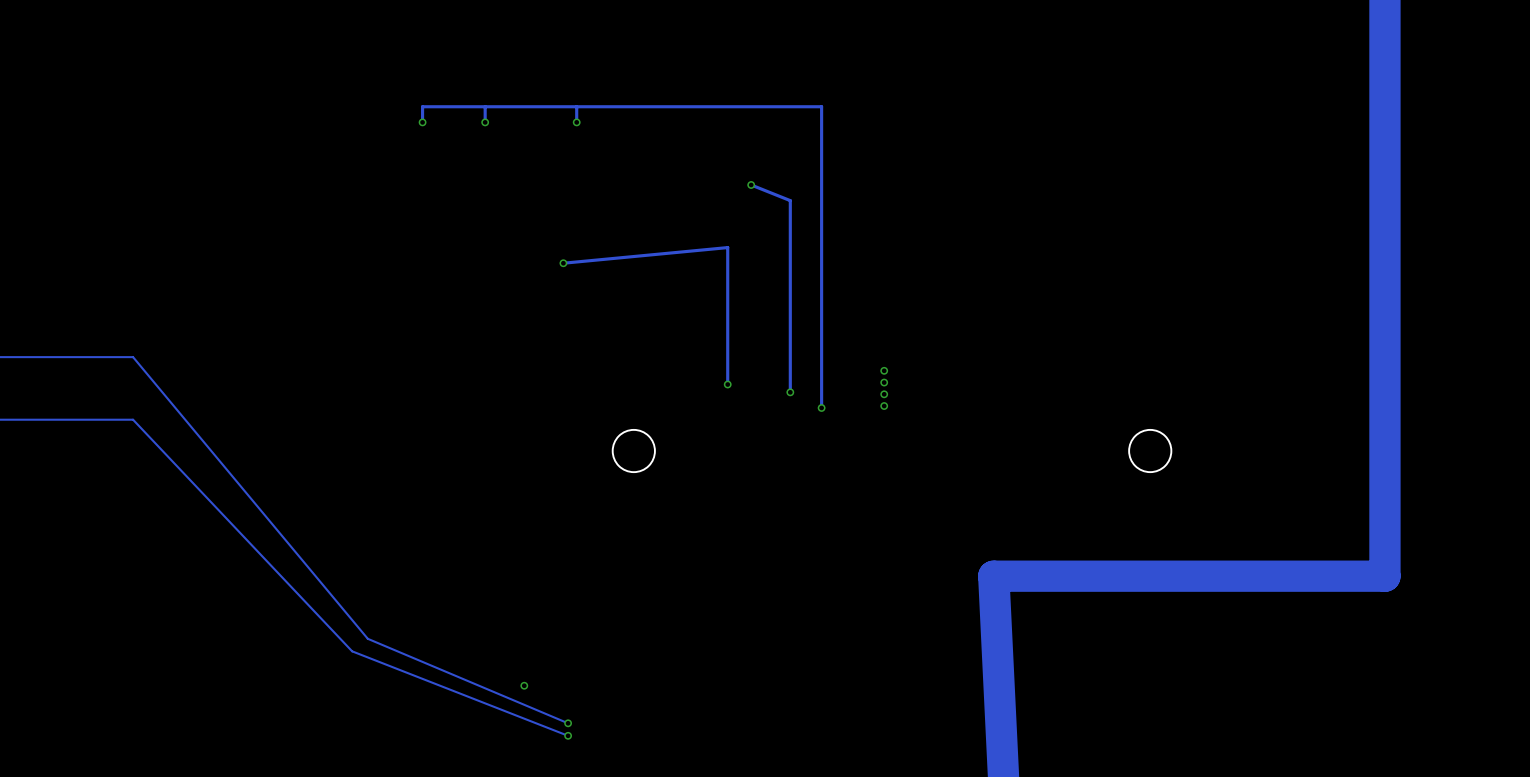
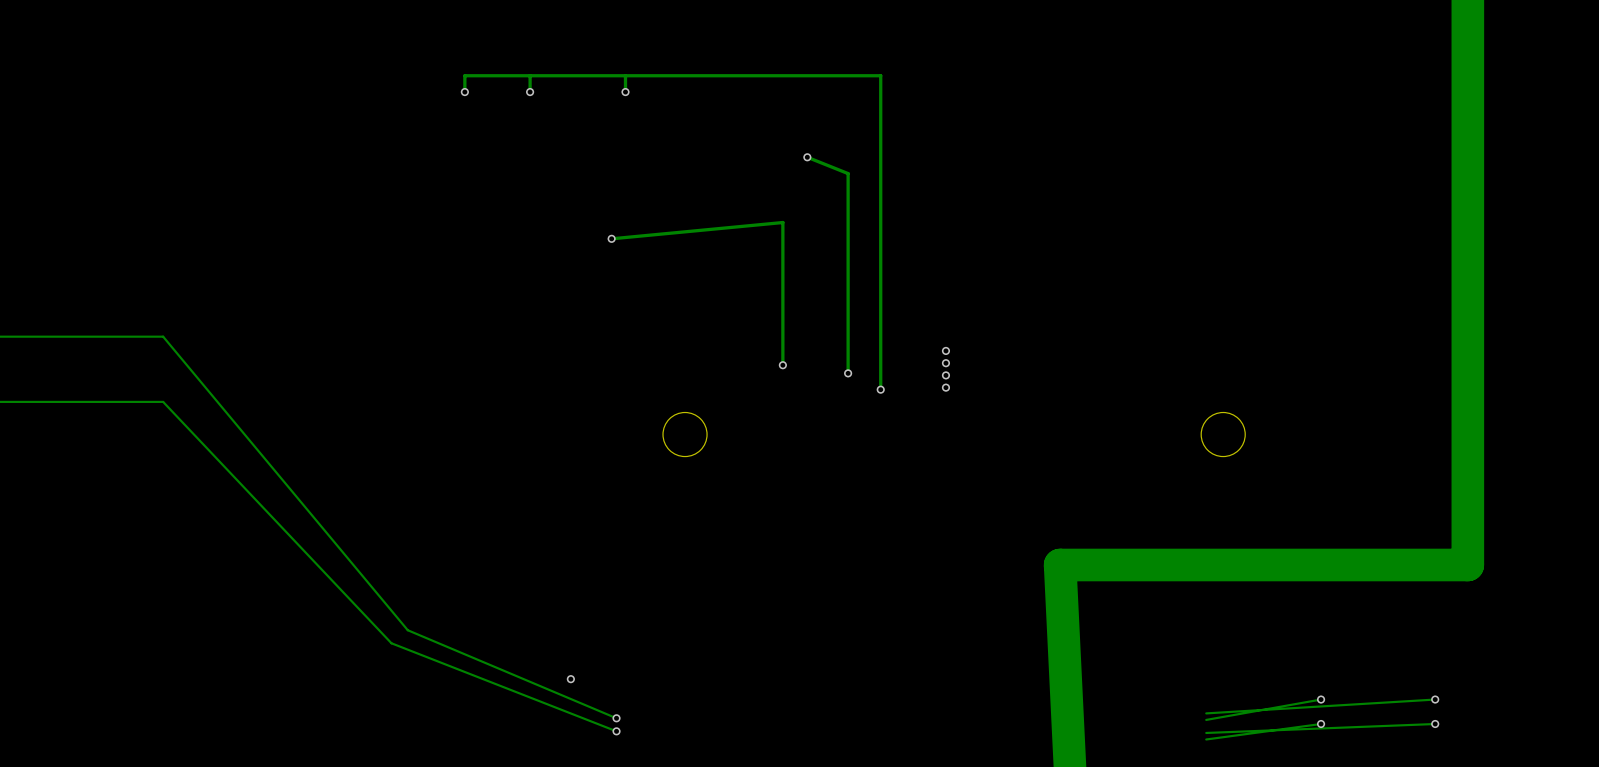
track: none -> (1321, 699) (1206, 719)
via: none -> (1321, 699)
track: none -> (1435, 699) (1206, 713)
via: none -> (1435, 699)
track: none -> (1321, 724) (1206, 739)
via: none -> (1321, 724)
track: none -> (1435, 724) (1206, 732)
via: none -> (1435, 724)

